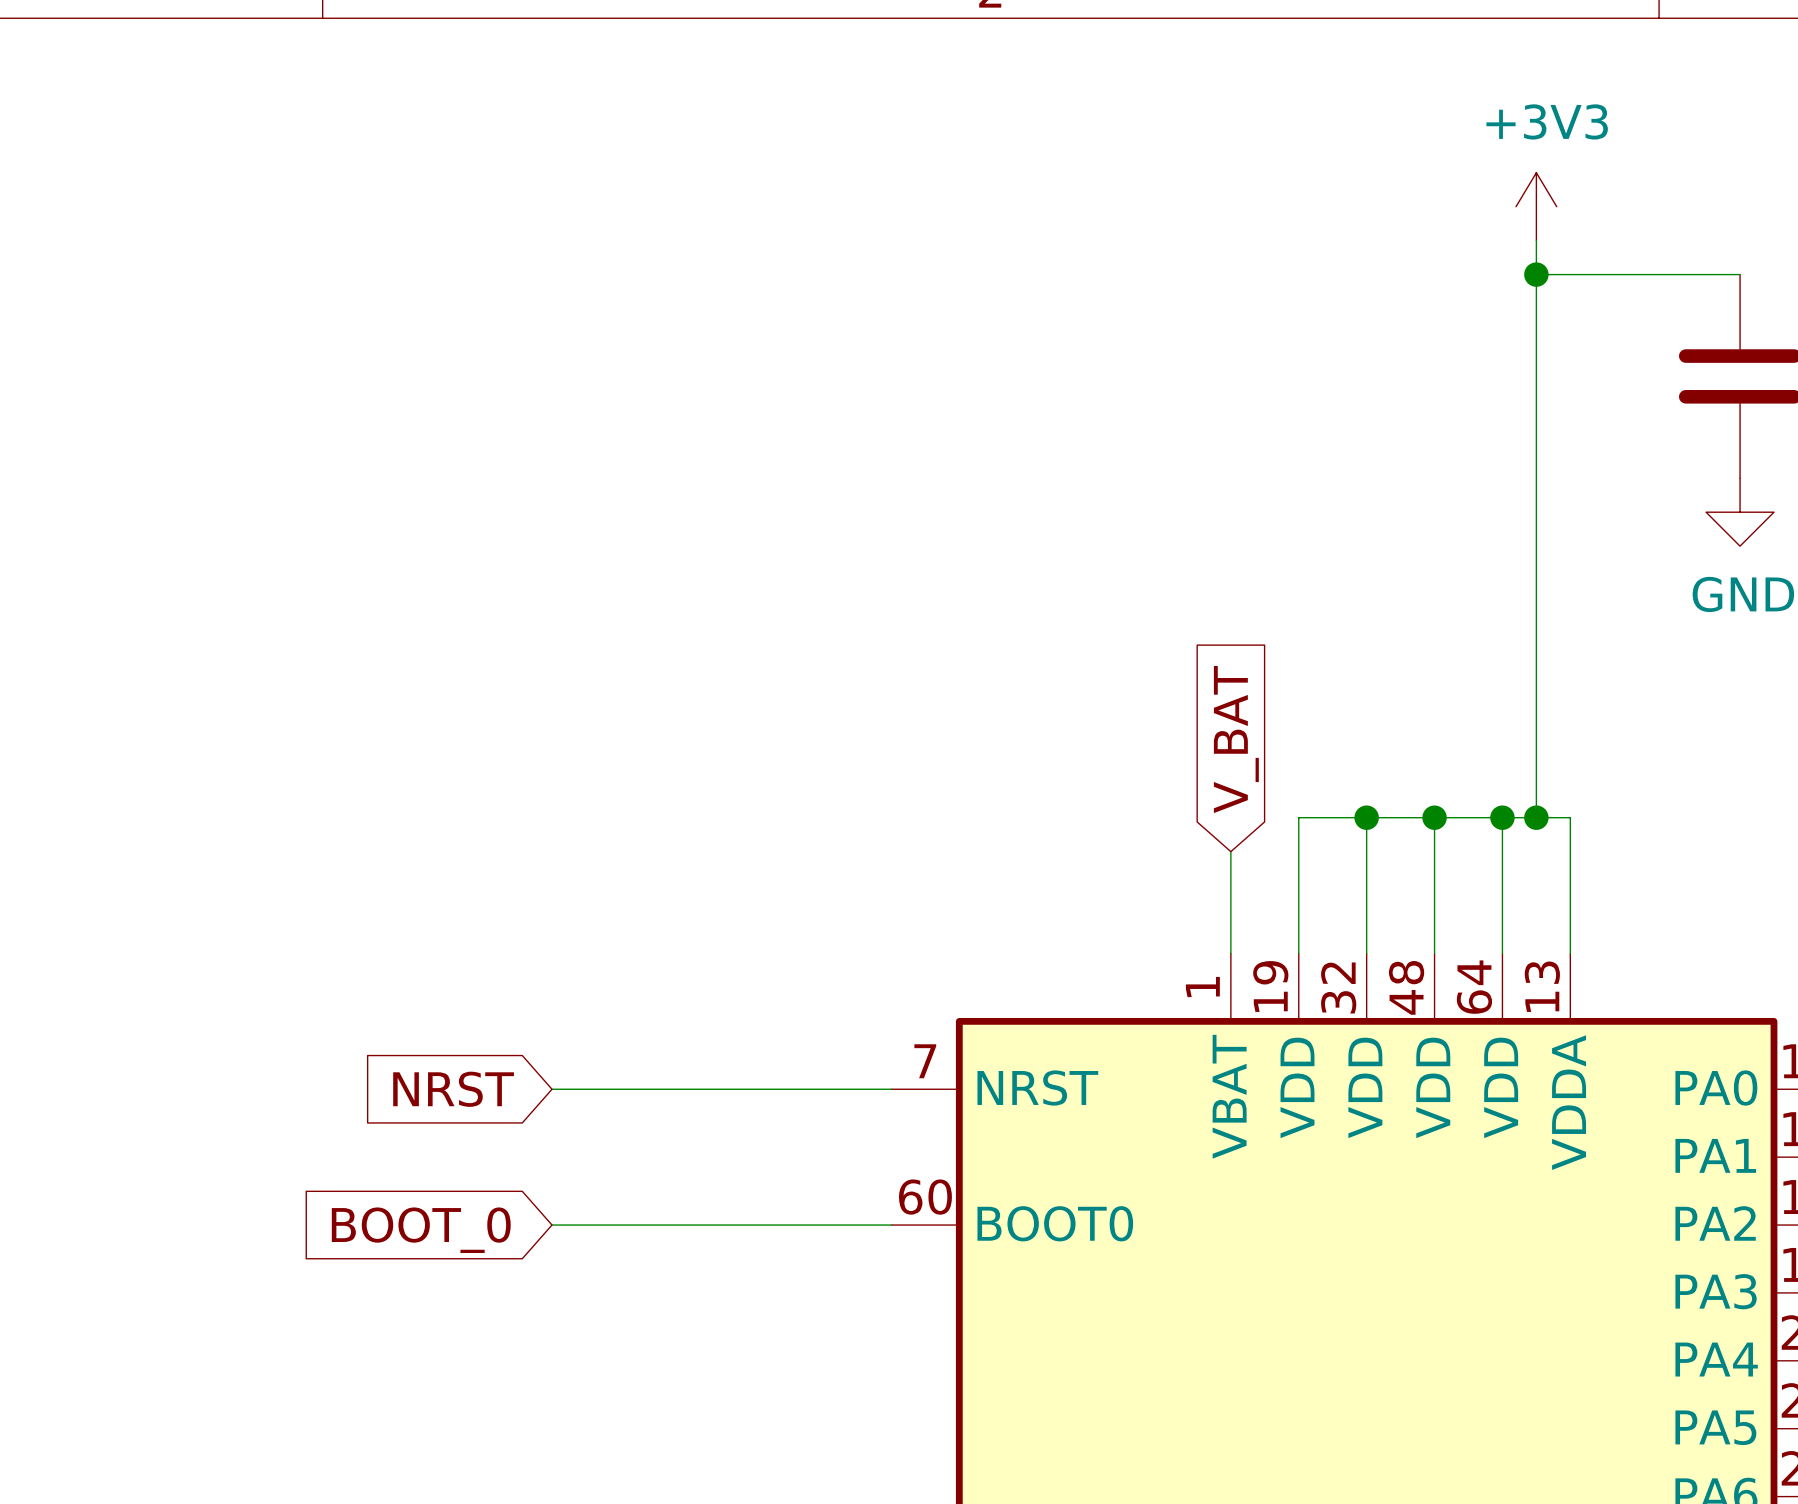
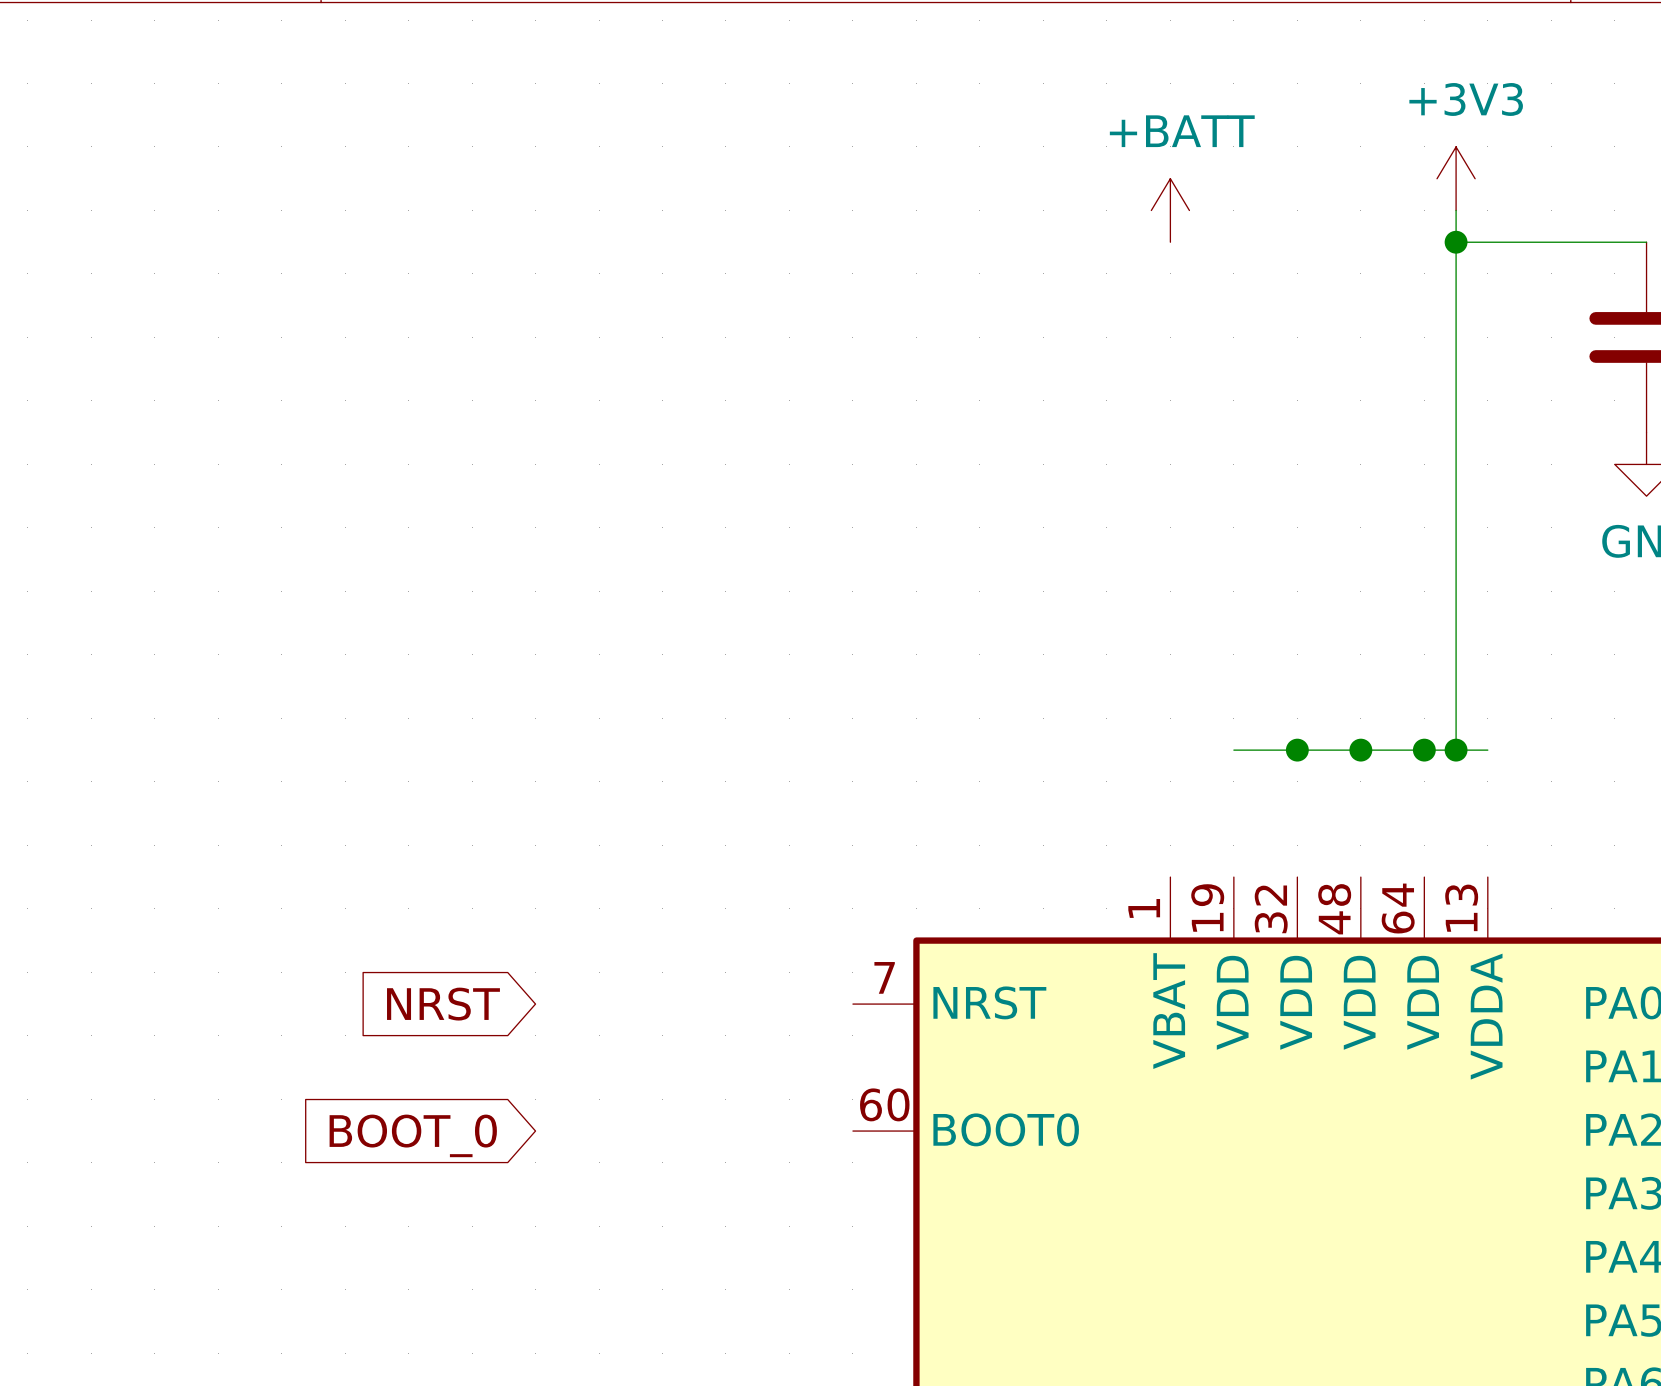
power symbol: none -> +BATT (1170, 210)
global label: V_BAT (1236, 739) -> none
wire: (1298, 817) (1298, 953) -> none
wire: (1366, 817) (1366, 953) -> none
wire: (1434, 817) (1434, 953) -> none
wire: (1502, 817) (1502, 953) -> none
wire: (1570, 817) (1570, 953) -> none
wire: (1230, 851) (1230, 953) -> none
wire: (551, 1089) (891, 1089) -> none
wire: (551, 1225) (891, 1225) -> none

